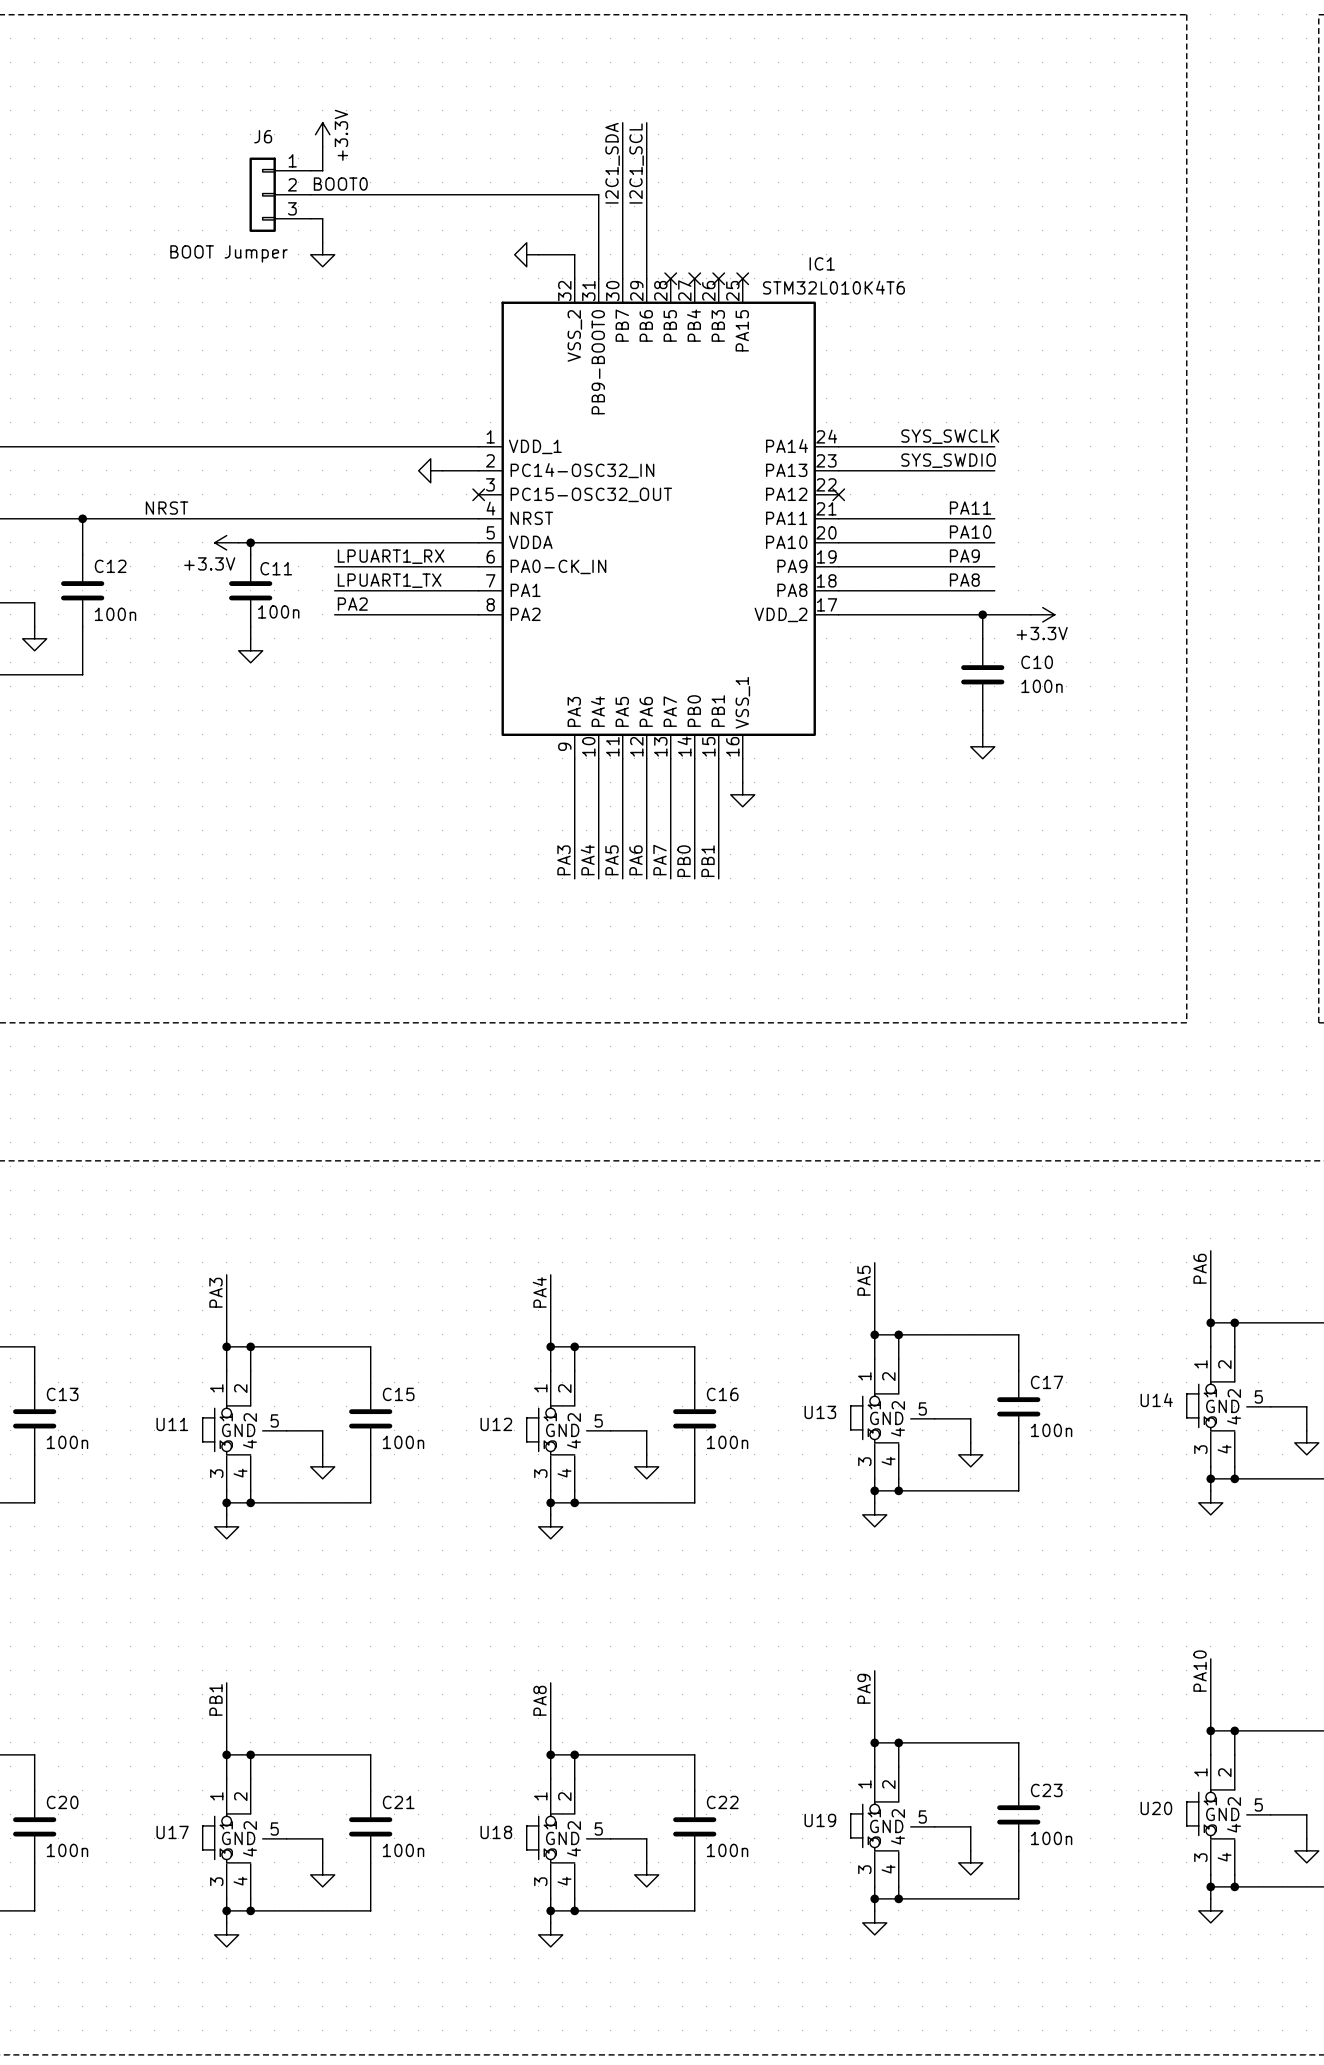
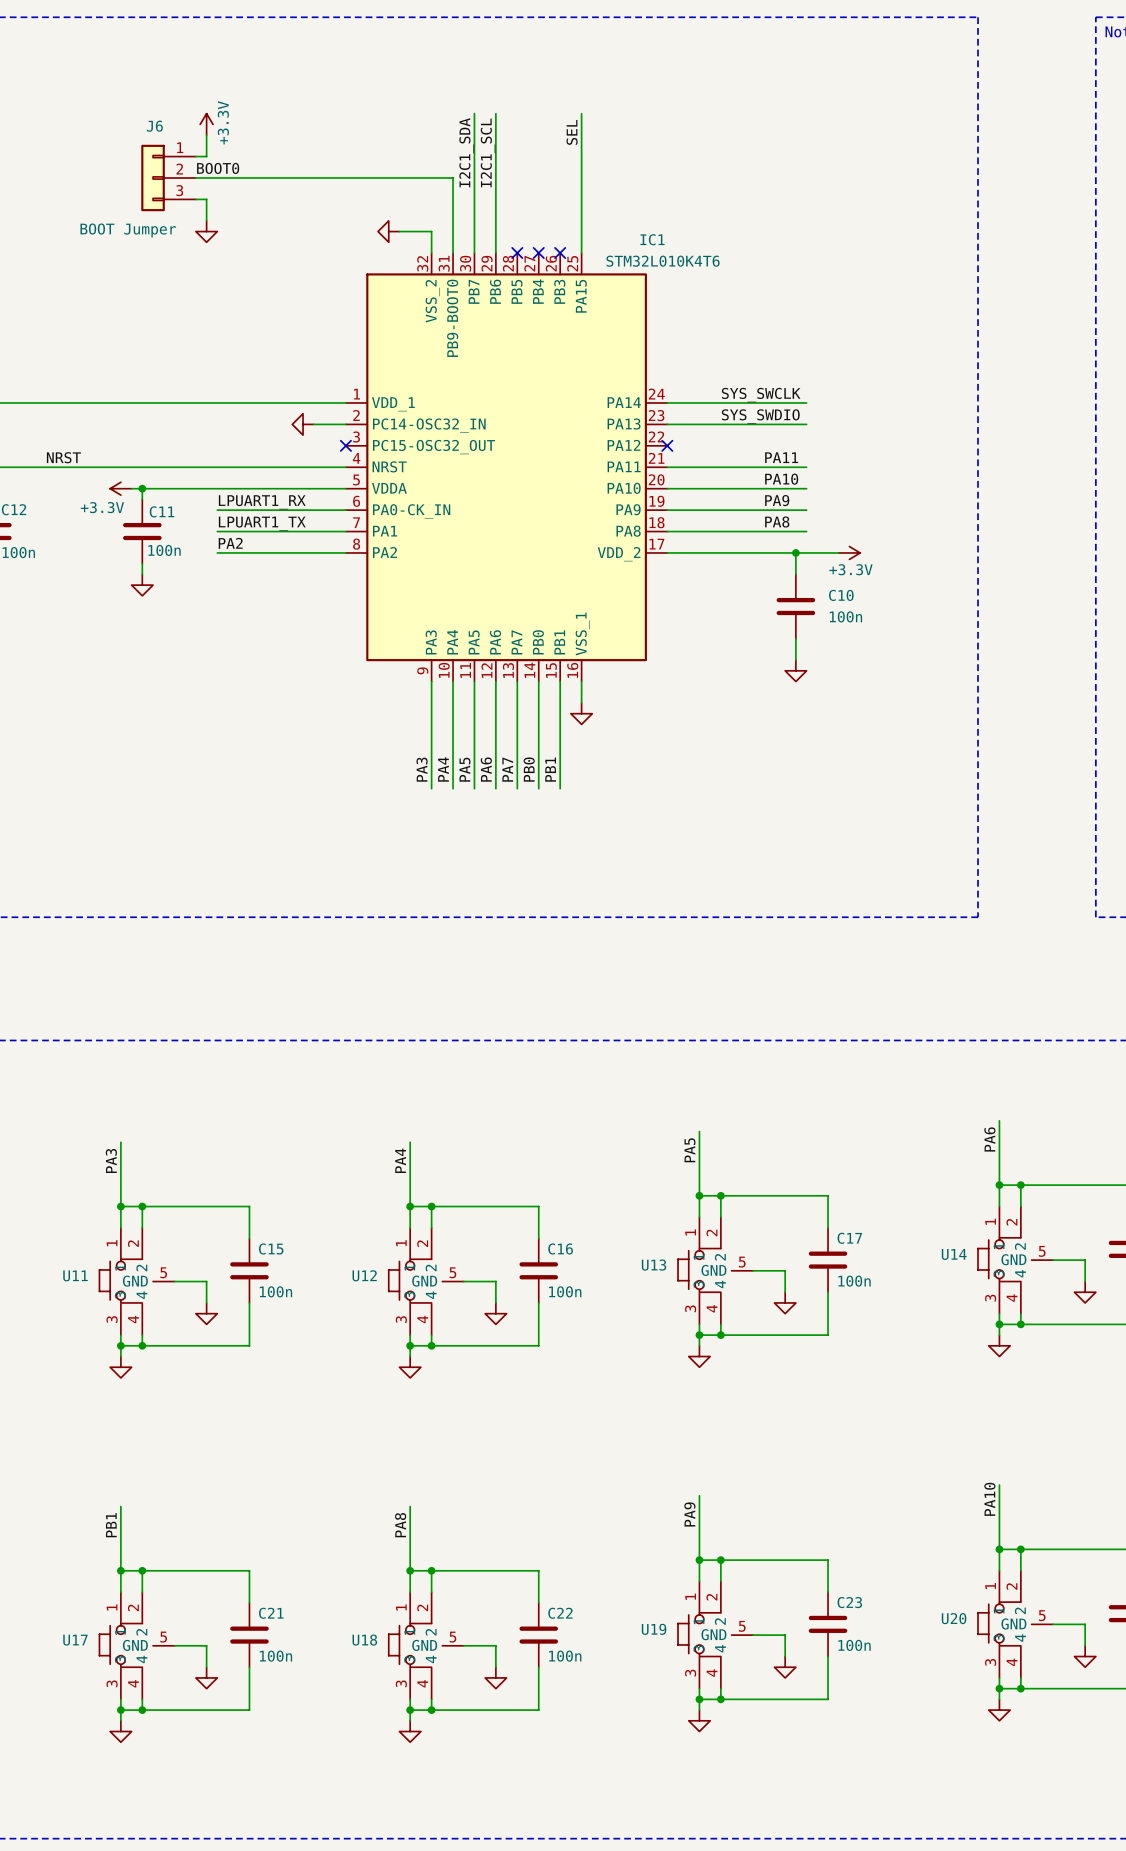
wire: none -> (581, 113) (581, 252)
label: none -> SEL (572, 132)
no-connect mark: (742, 278) -> none

